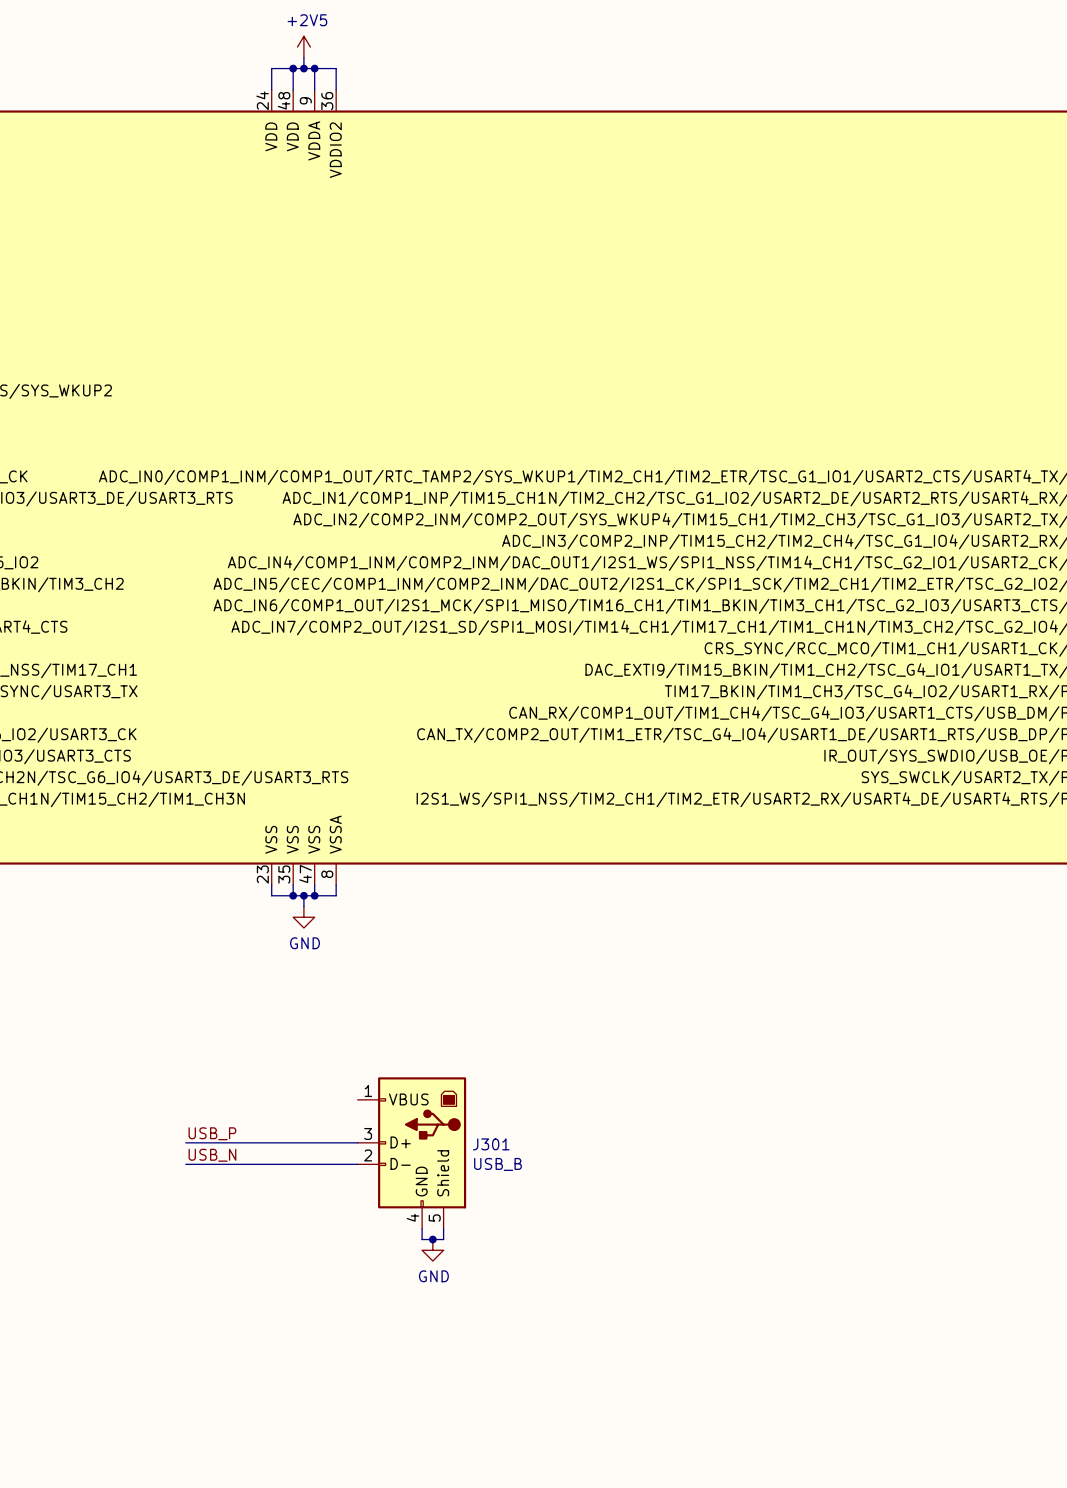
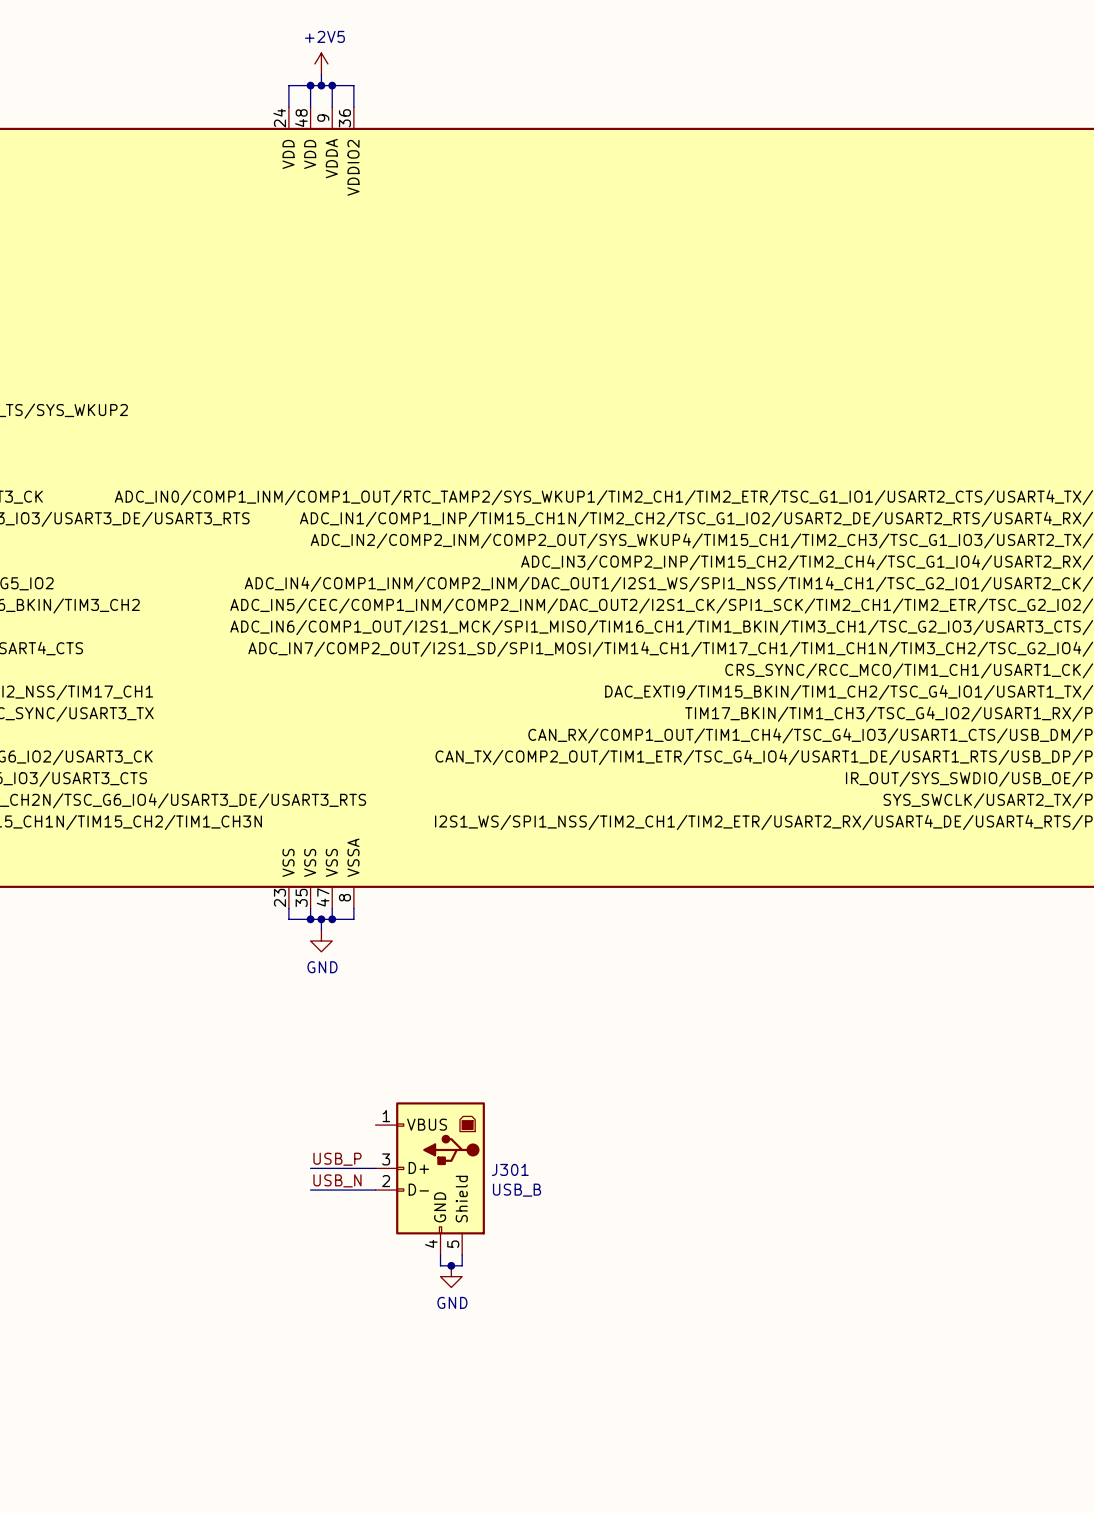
label position: USB_P (212, 1133) -> USB_P (337, 1159)
wire: (185, 1142) (293, 1142) -> none
label position: USB_N (212, 1155) -> USB_N (337, 1180)
wire: (185, 1164) (293, 1164) -> none

